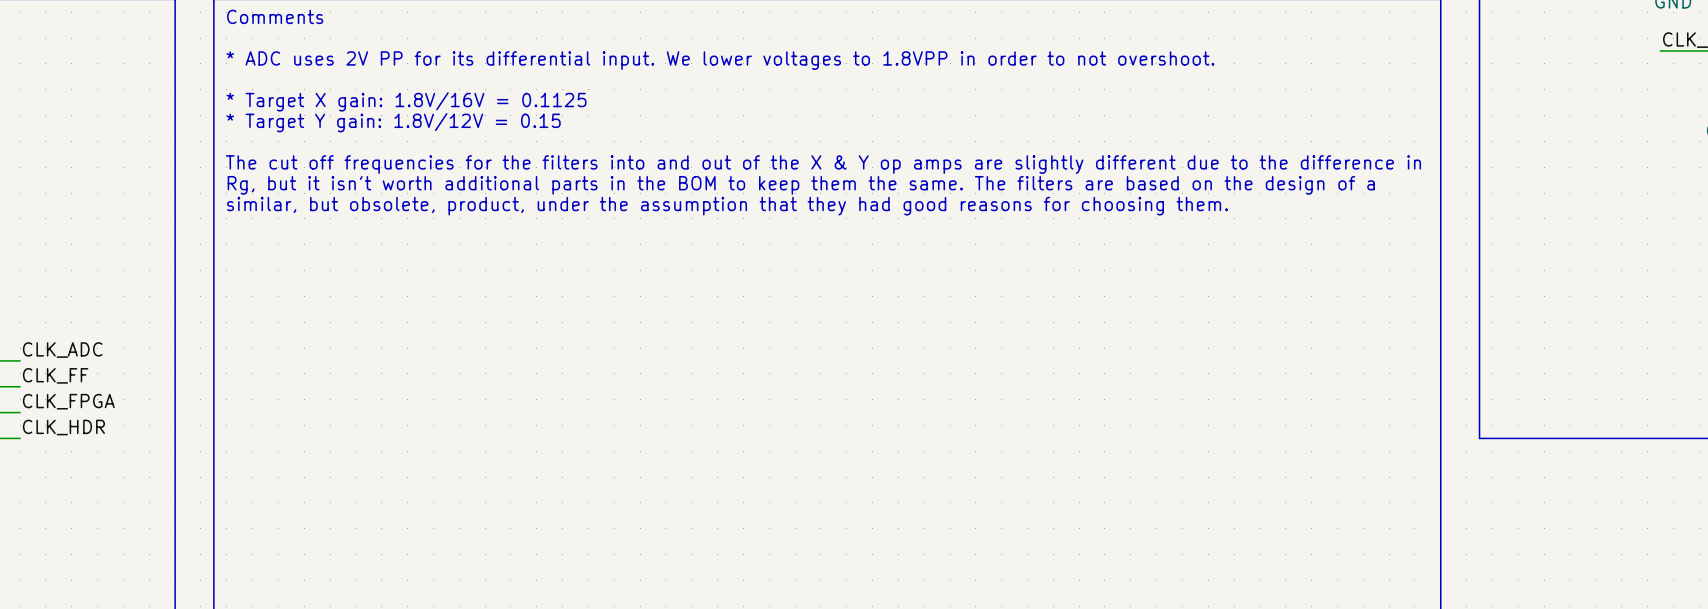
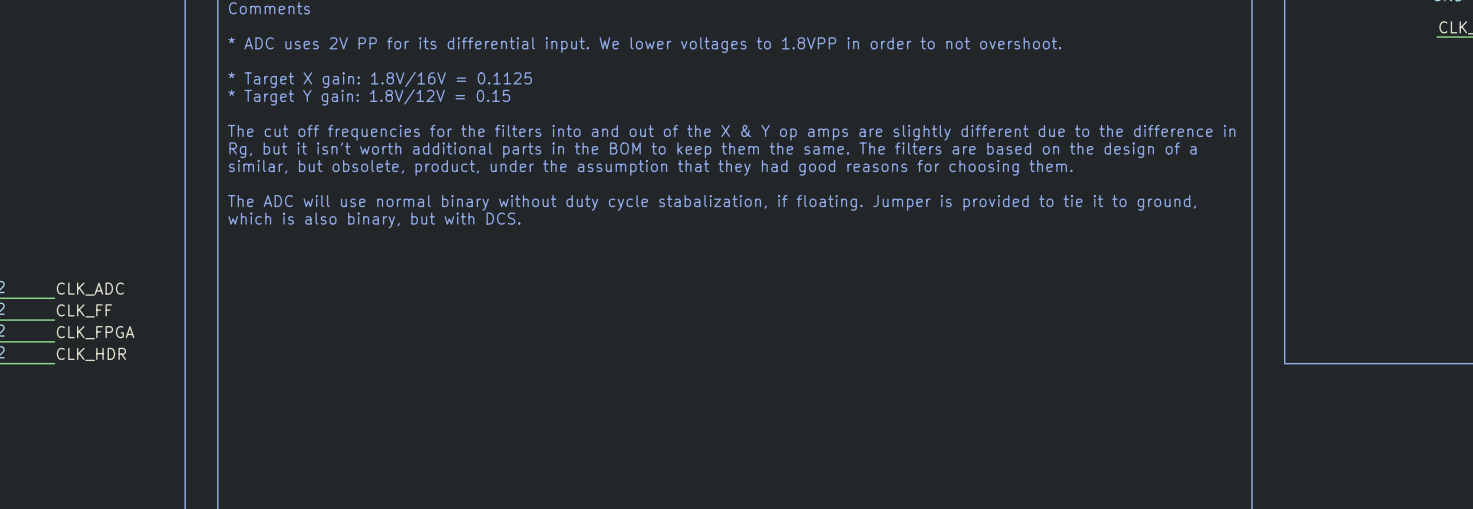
text: none -> The ADC will use normal binary without duty cycle stabalization, if floating. Jumper is provided to tie it to ground, (711, 202)
text: none -> which is also binary, but with DCS. (374, 220)

